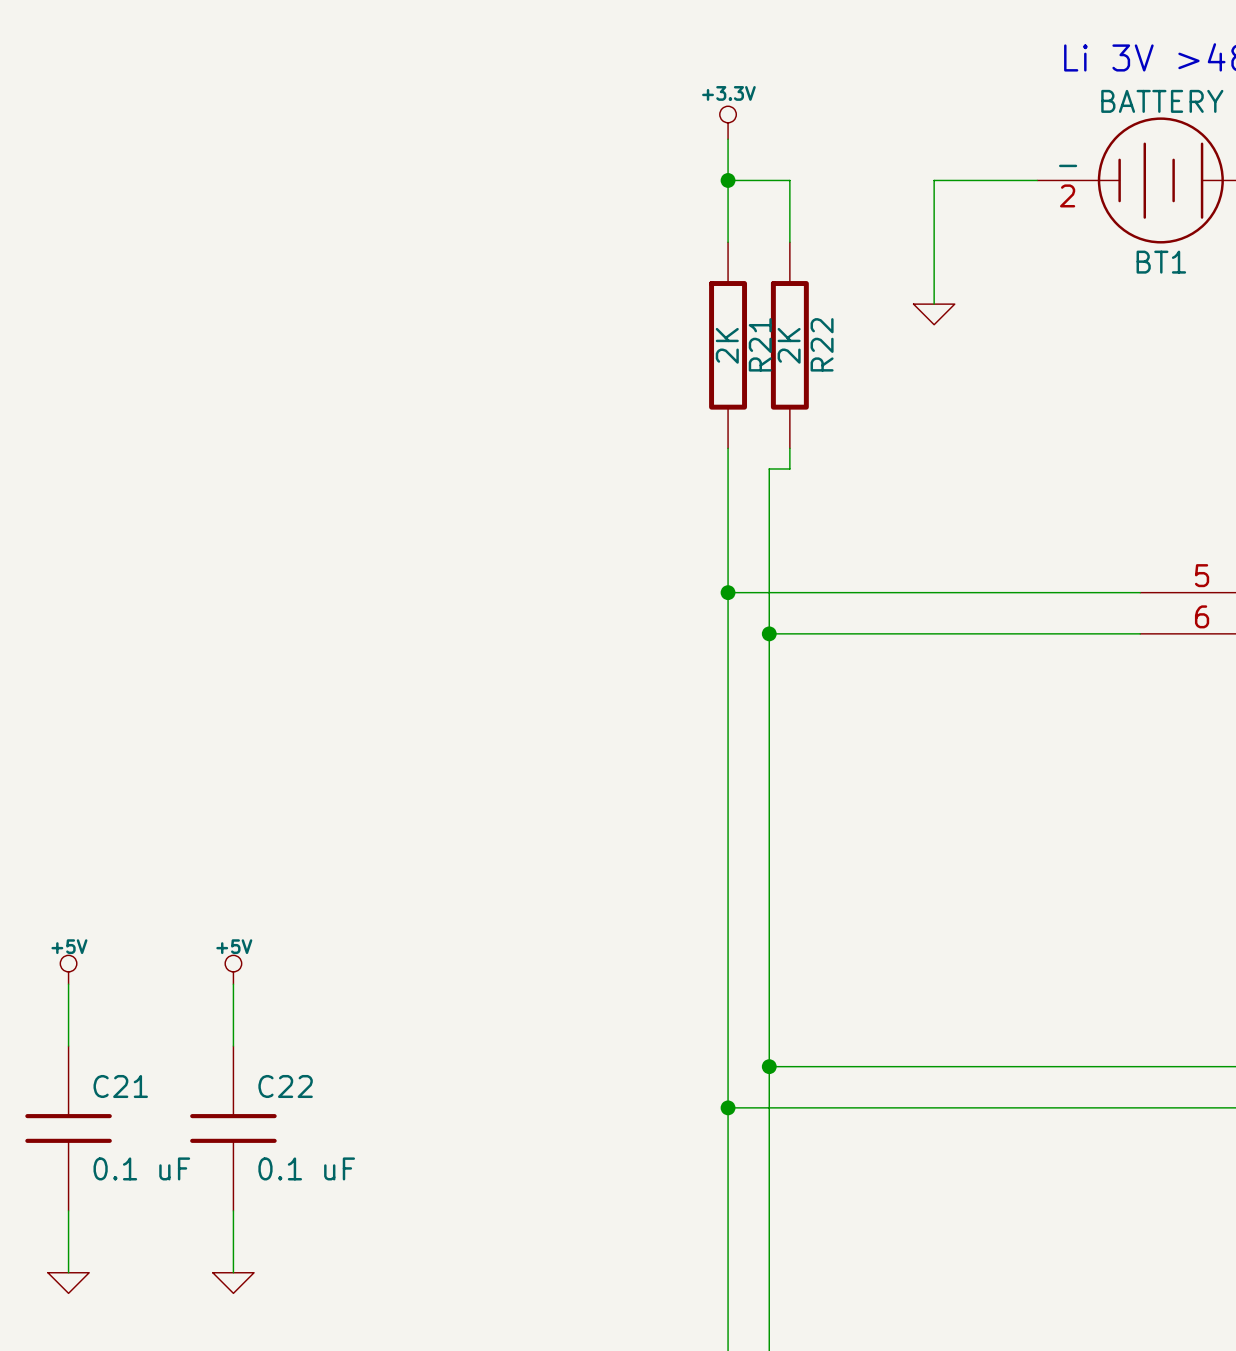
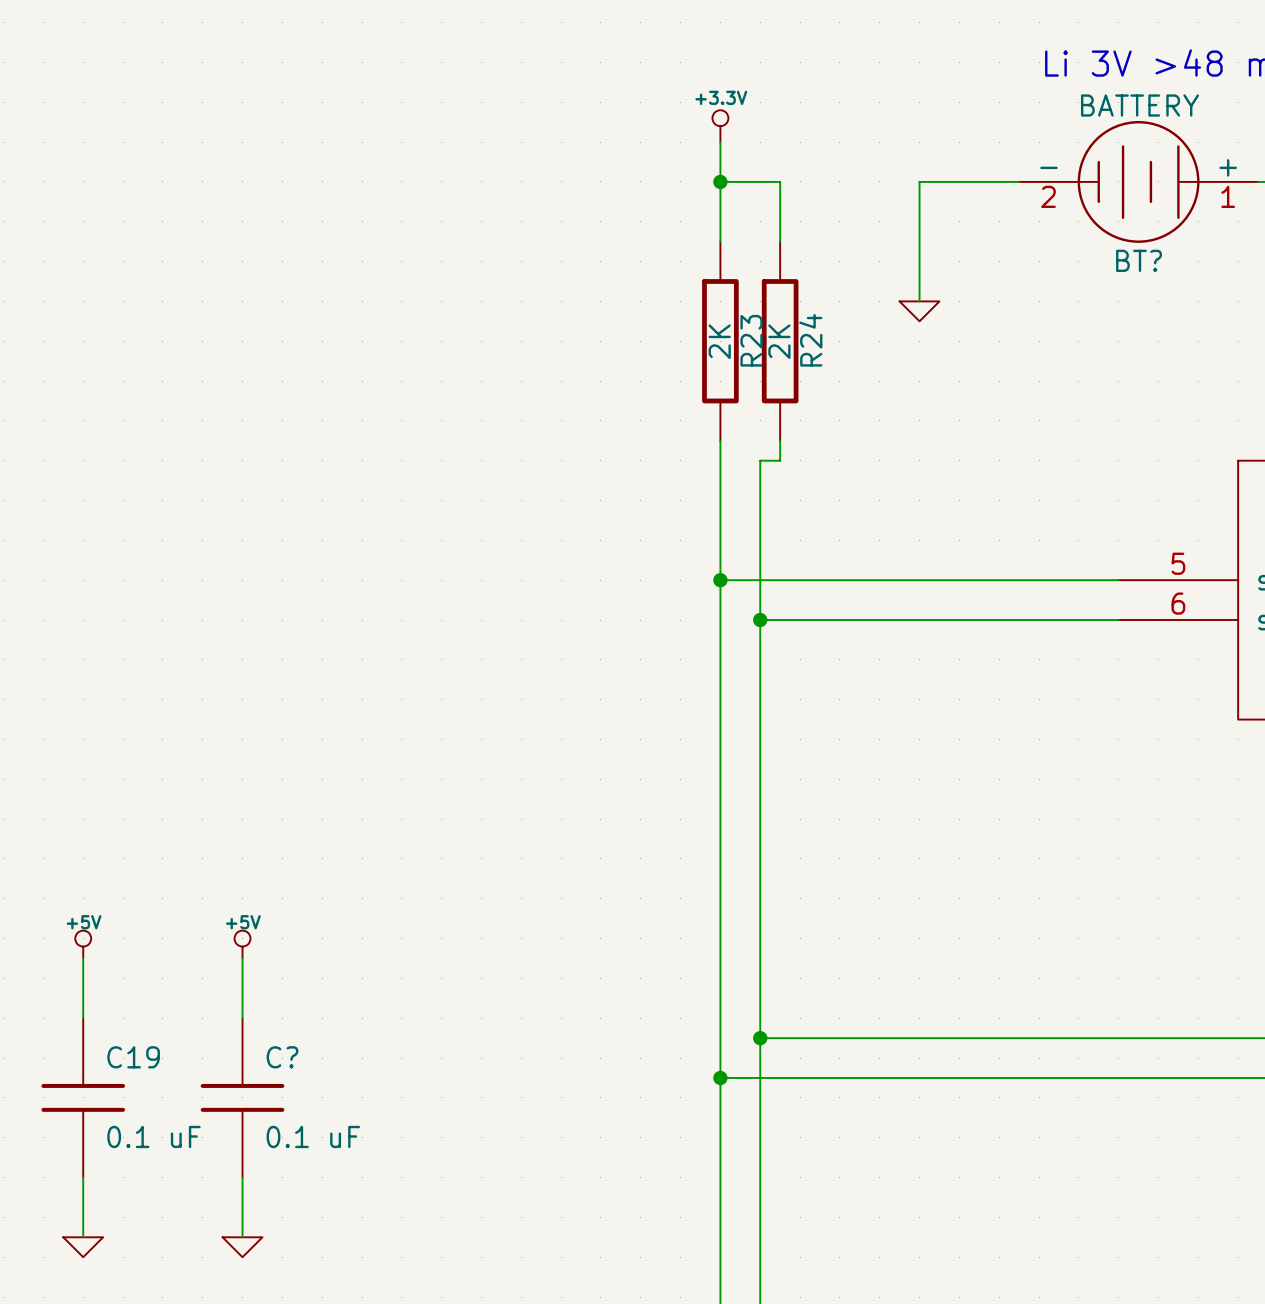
BT1 name: BT1 (1161, 262) -> BT? (1139, 260)
R21 name: R21 (760, 344) -> R23 (751, 340)
R22 name: R22 (822, 344) -> R24 (810, 340)
C21 name: C21 (120, 1086) -> C19 (133, 1057)
C22 name: C22 (285, 1086) -> C? (282, 1057)

